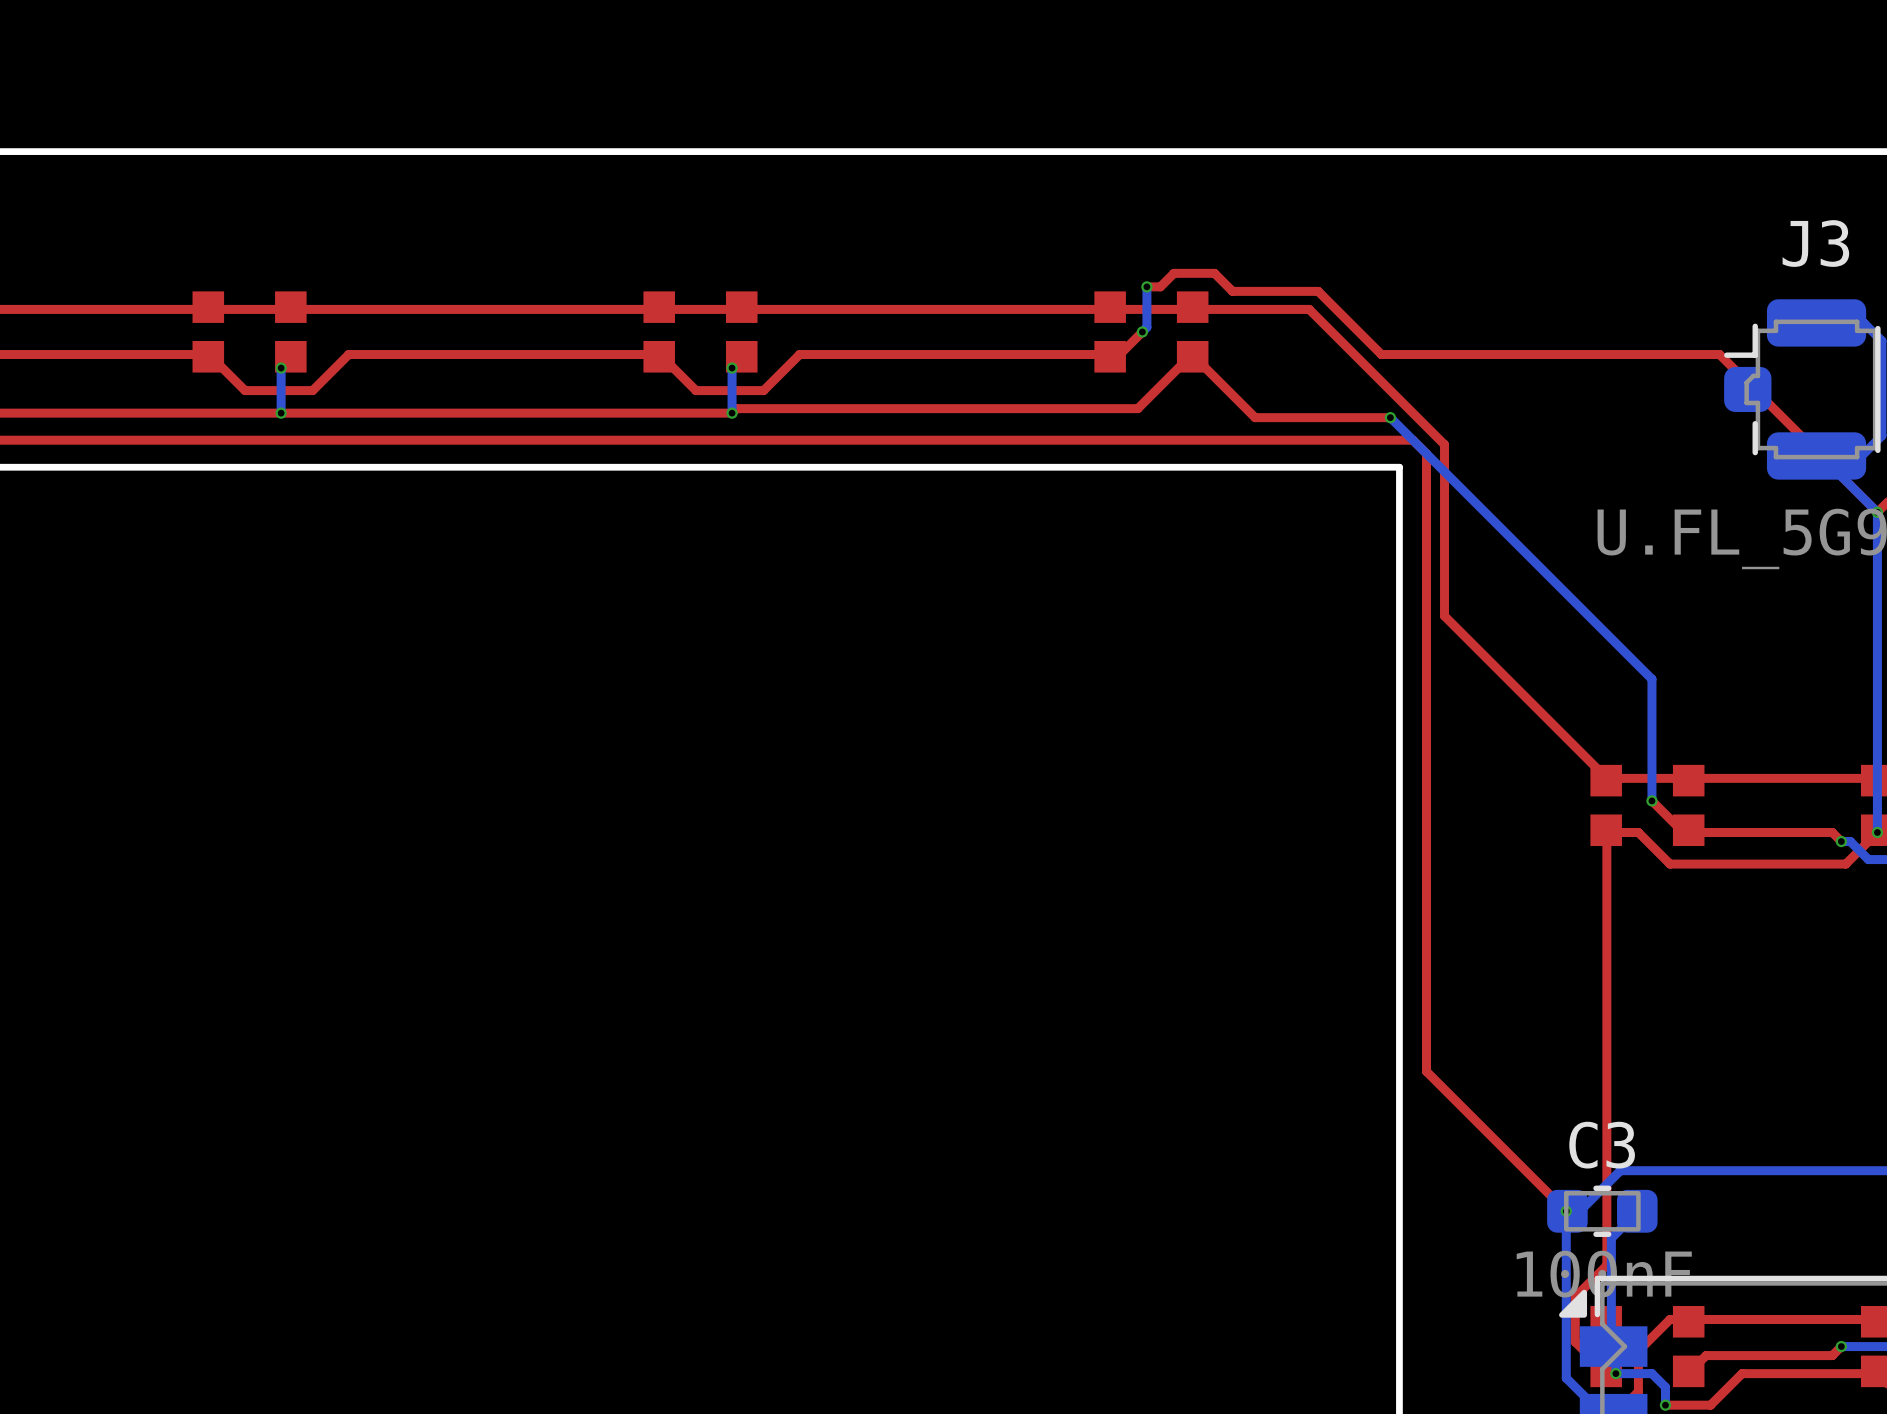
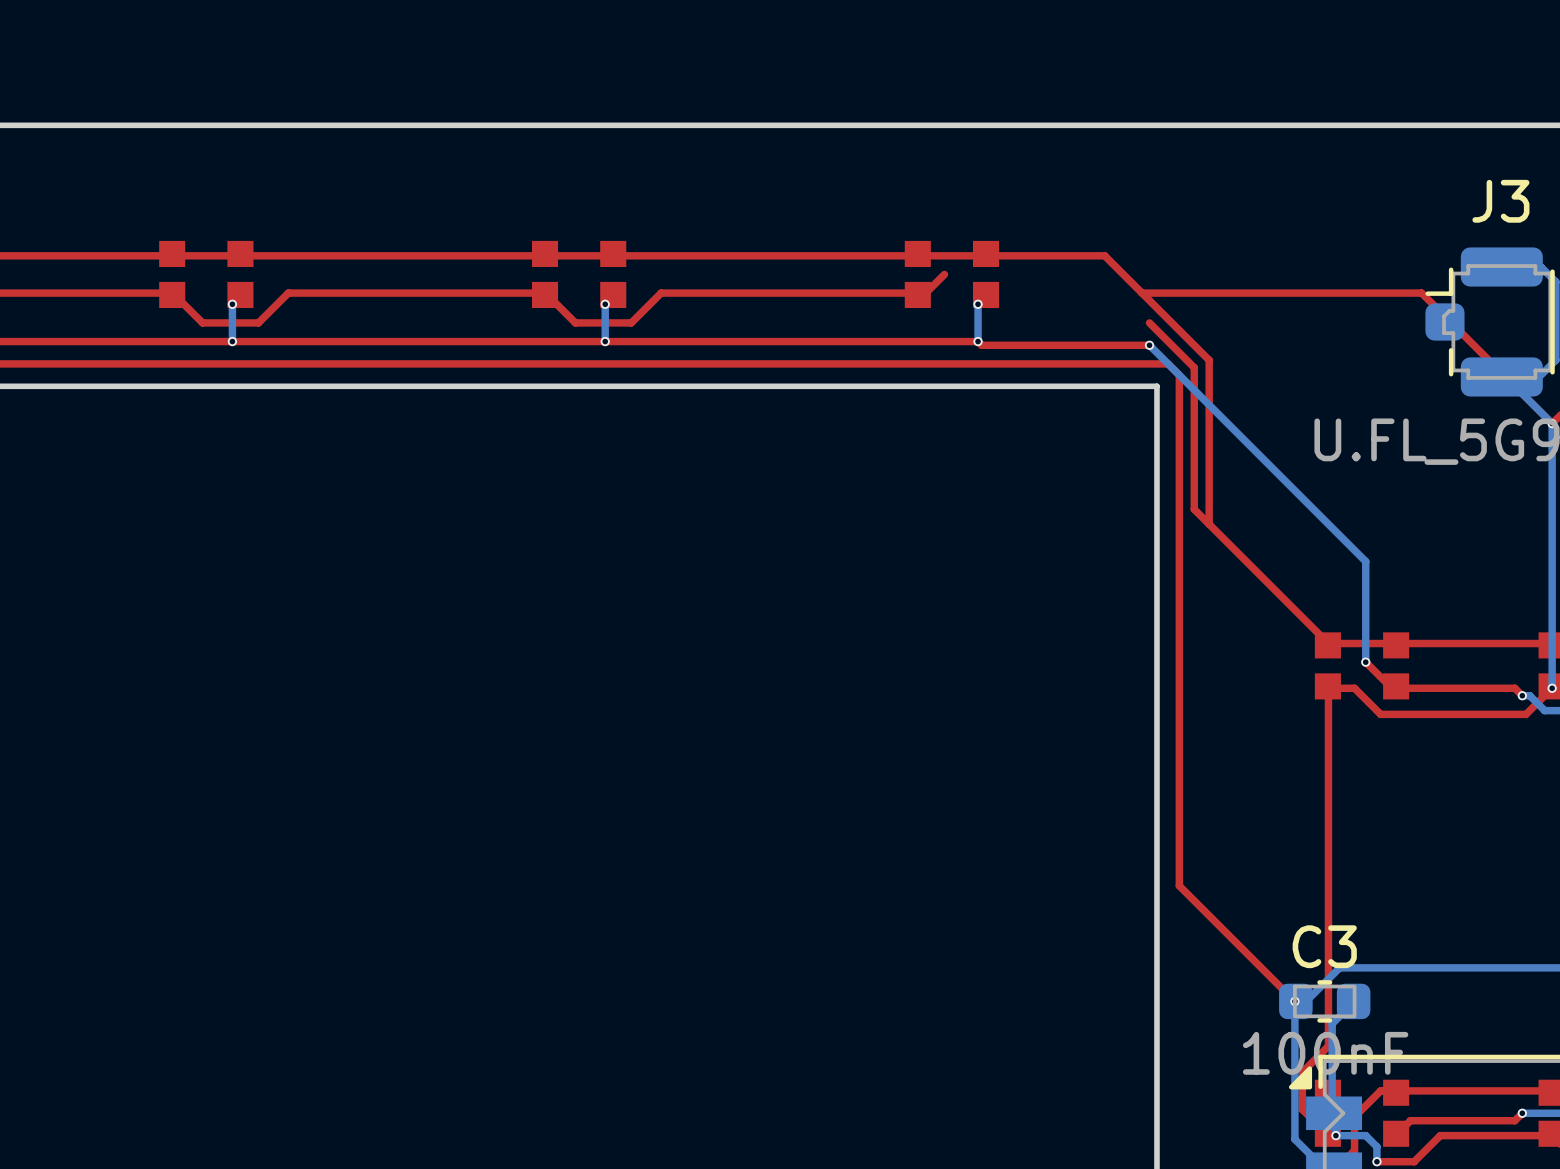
top track: (1146, 286) (1160, 286) (1173, 273) (1214, 273) (1232, 291) (1318, 291) (1336, 309) -> none
bottom track: (1146, 286) (1146, 327) (1142, 331) -> none
via: (1146, 286) -> none
top track: (1309, 309) (1390, 390) -> (1082, 255) (1104, 255)
via: (1142, 331) -> none
top track: none -> (1142, 293) (1209, 360) (1209, 524)
bottom track: none -> (978, 304) (978, 341)
via: none -> (978, 304)
top track: (732, 413) (736, 408) (1137, 408) (1192, 354) (1255, 417) -> (605, 341) (978, 341) (981, 345) (1037, 345)
via: none -> (978, 341)

